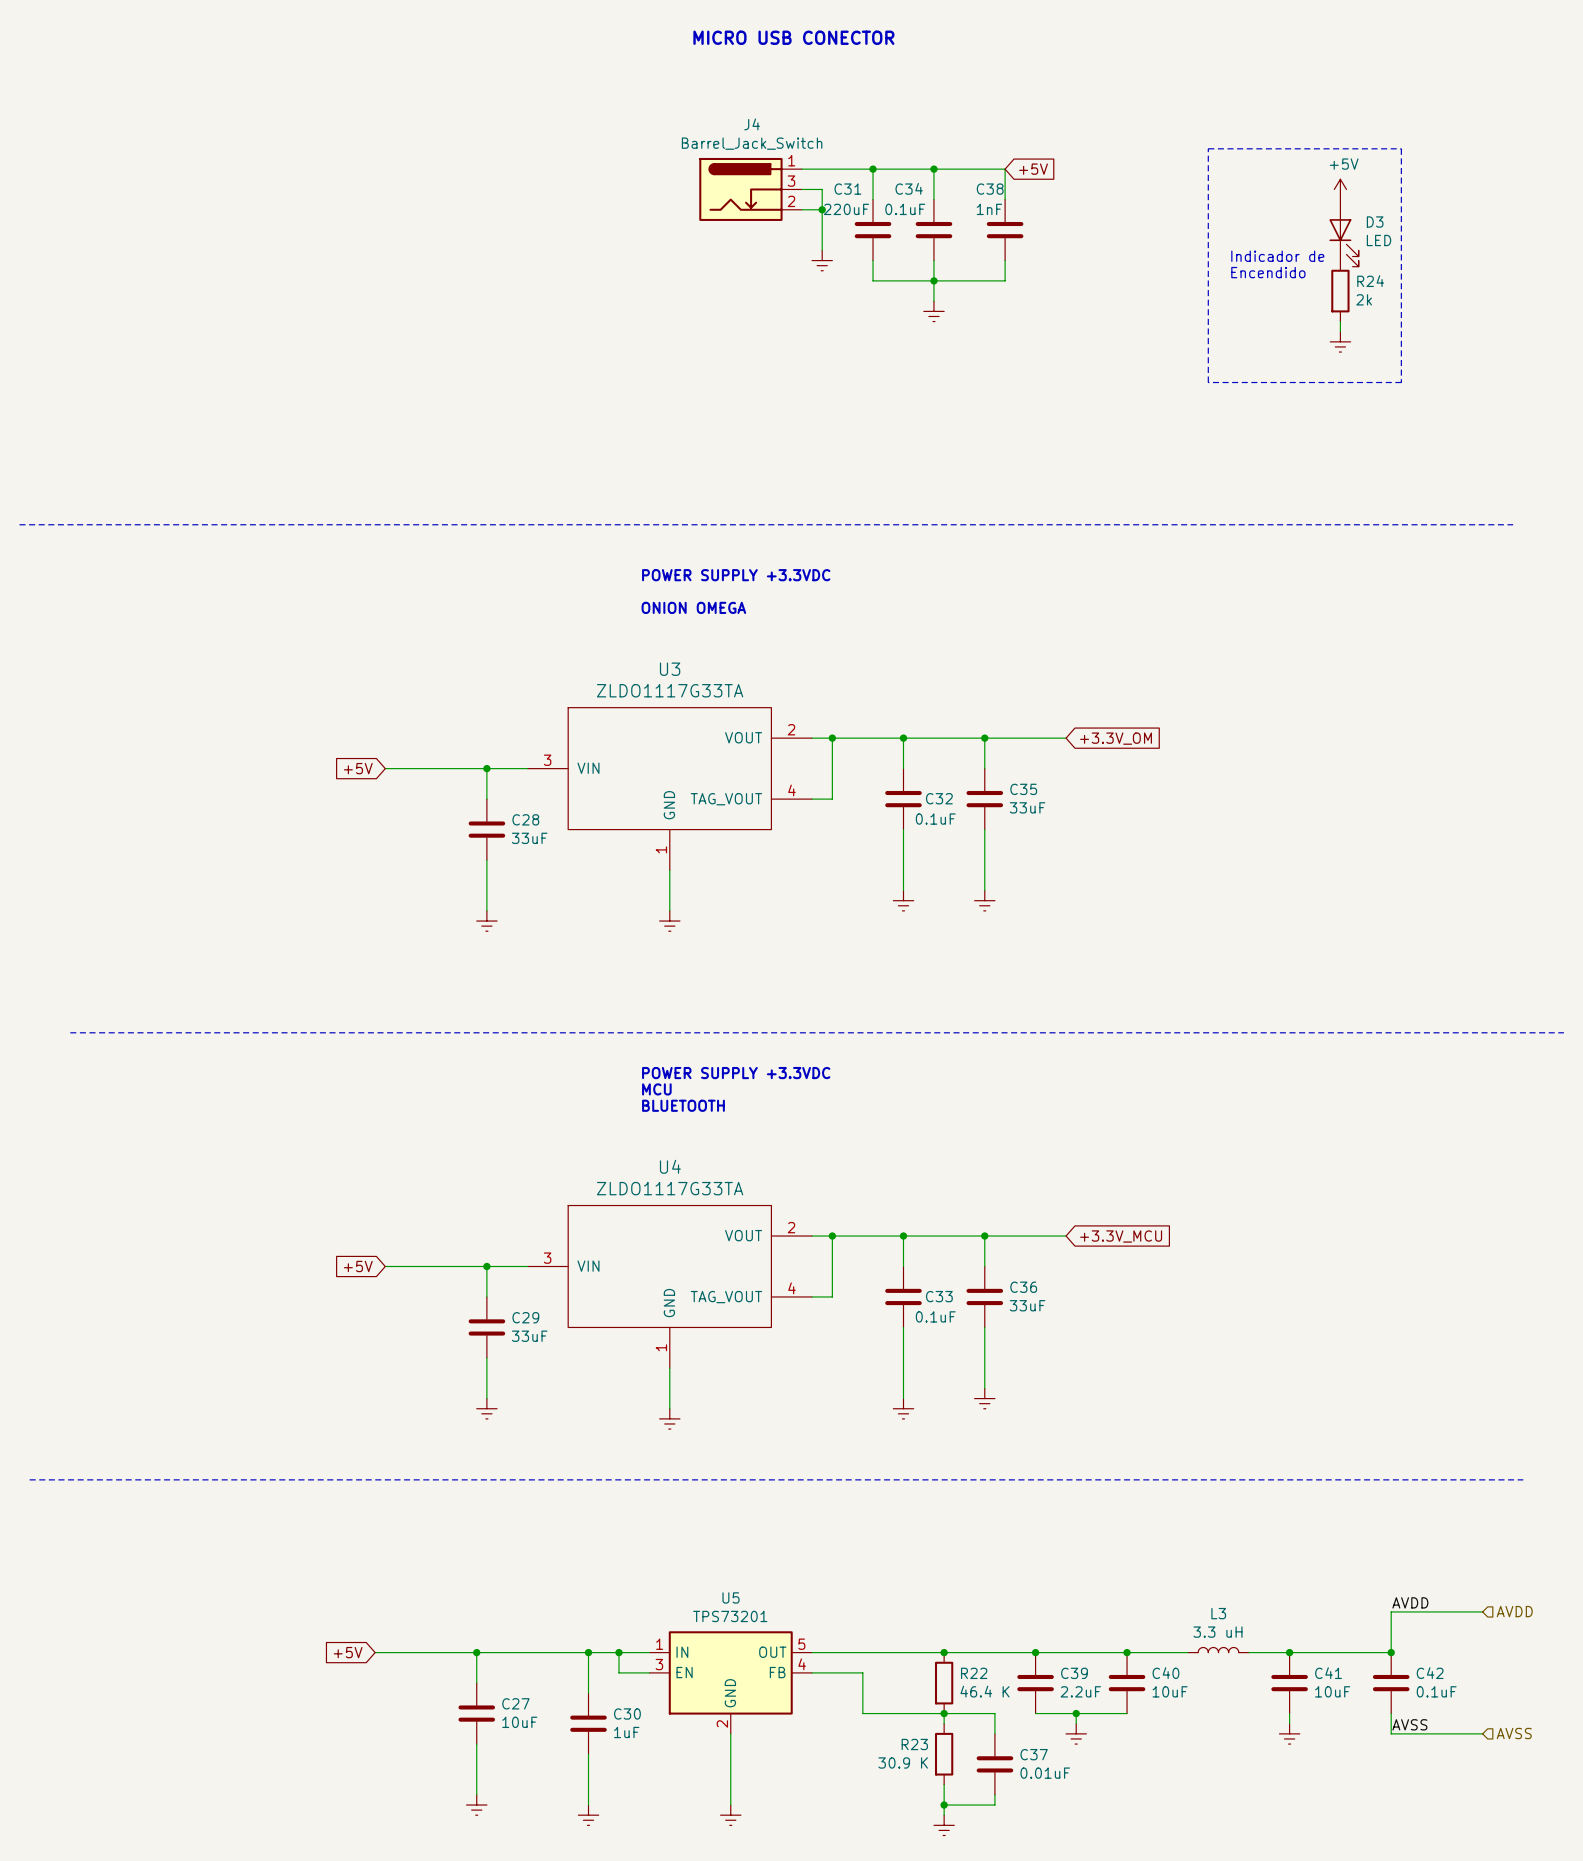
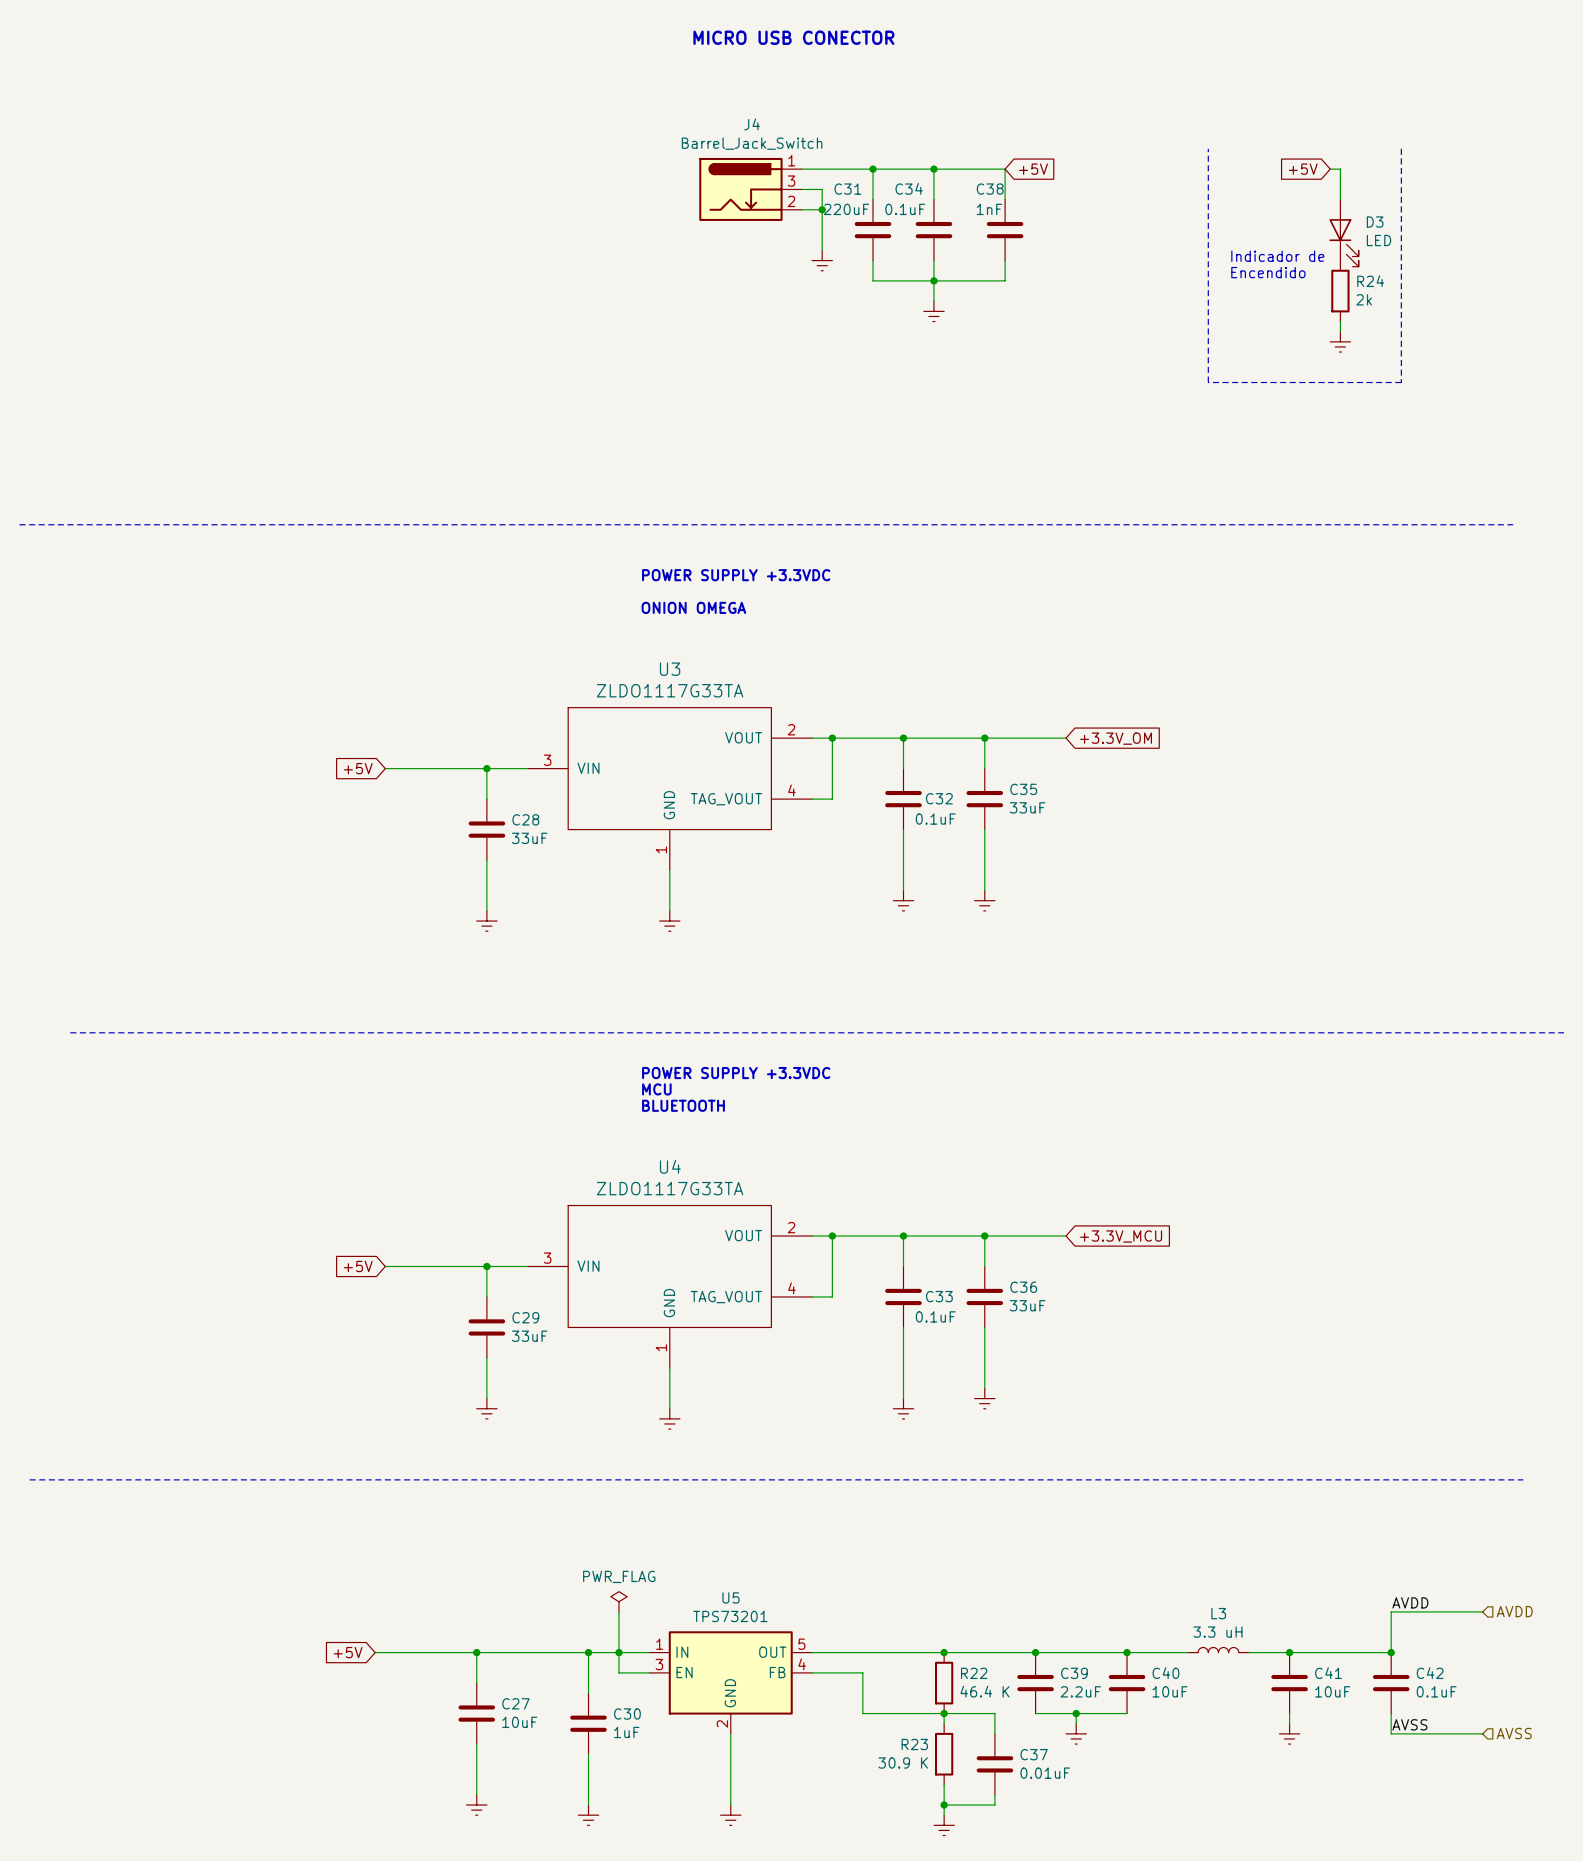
line: (1208, 148) (1401, 148) -> none
global label: none -> +5V (1303, 169)
wire: none -> (1330, 169) (1340, 169) (1340, 199)
power symbol: +5V (1340, 189) -> none
power symbol: none -> PWR_FLAG (618, 1601)
wire: none -> (618, 1611) (618, 1652)

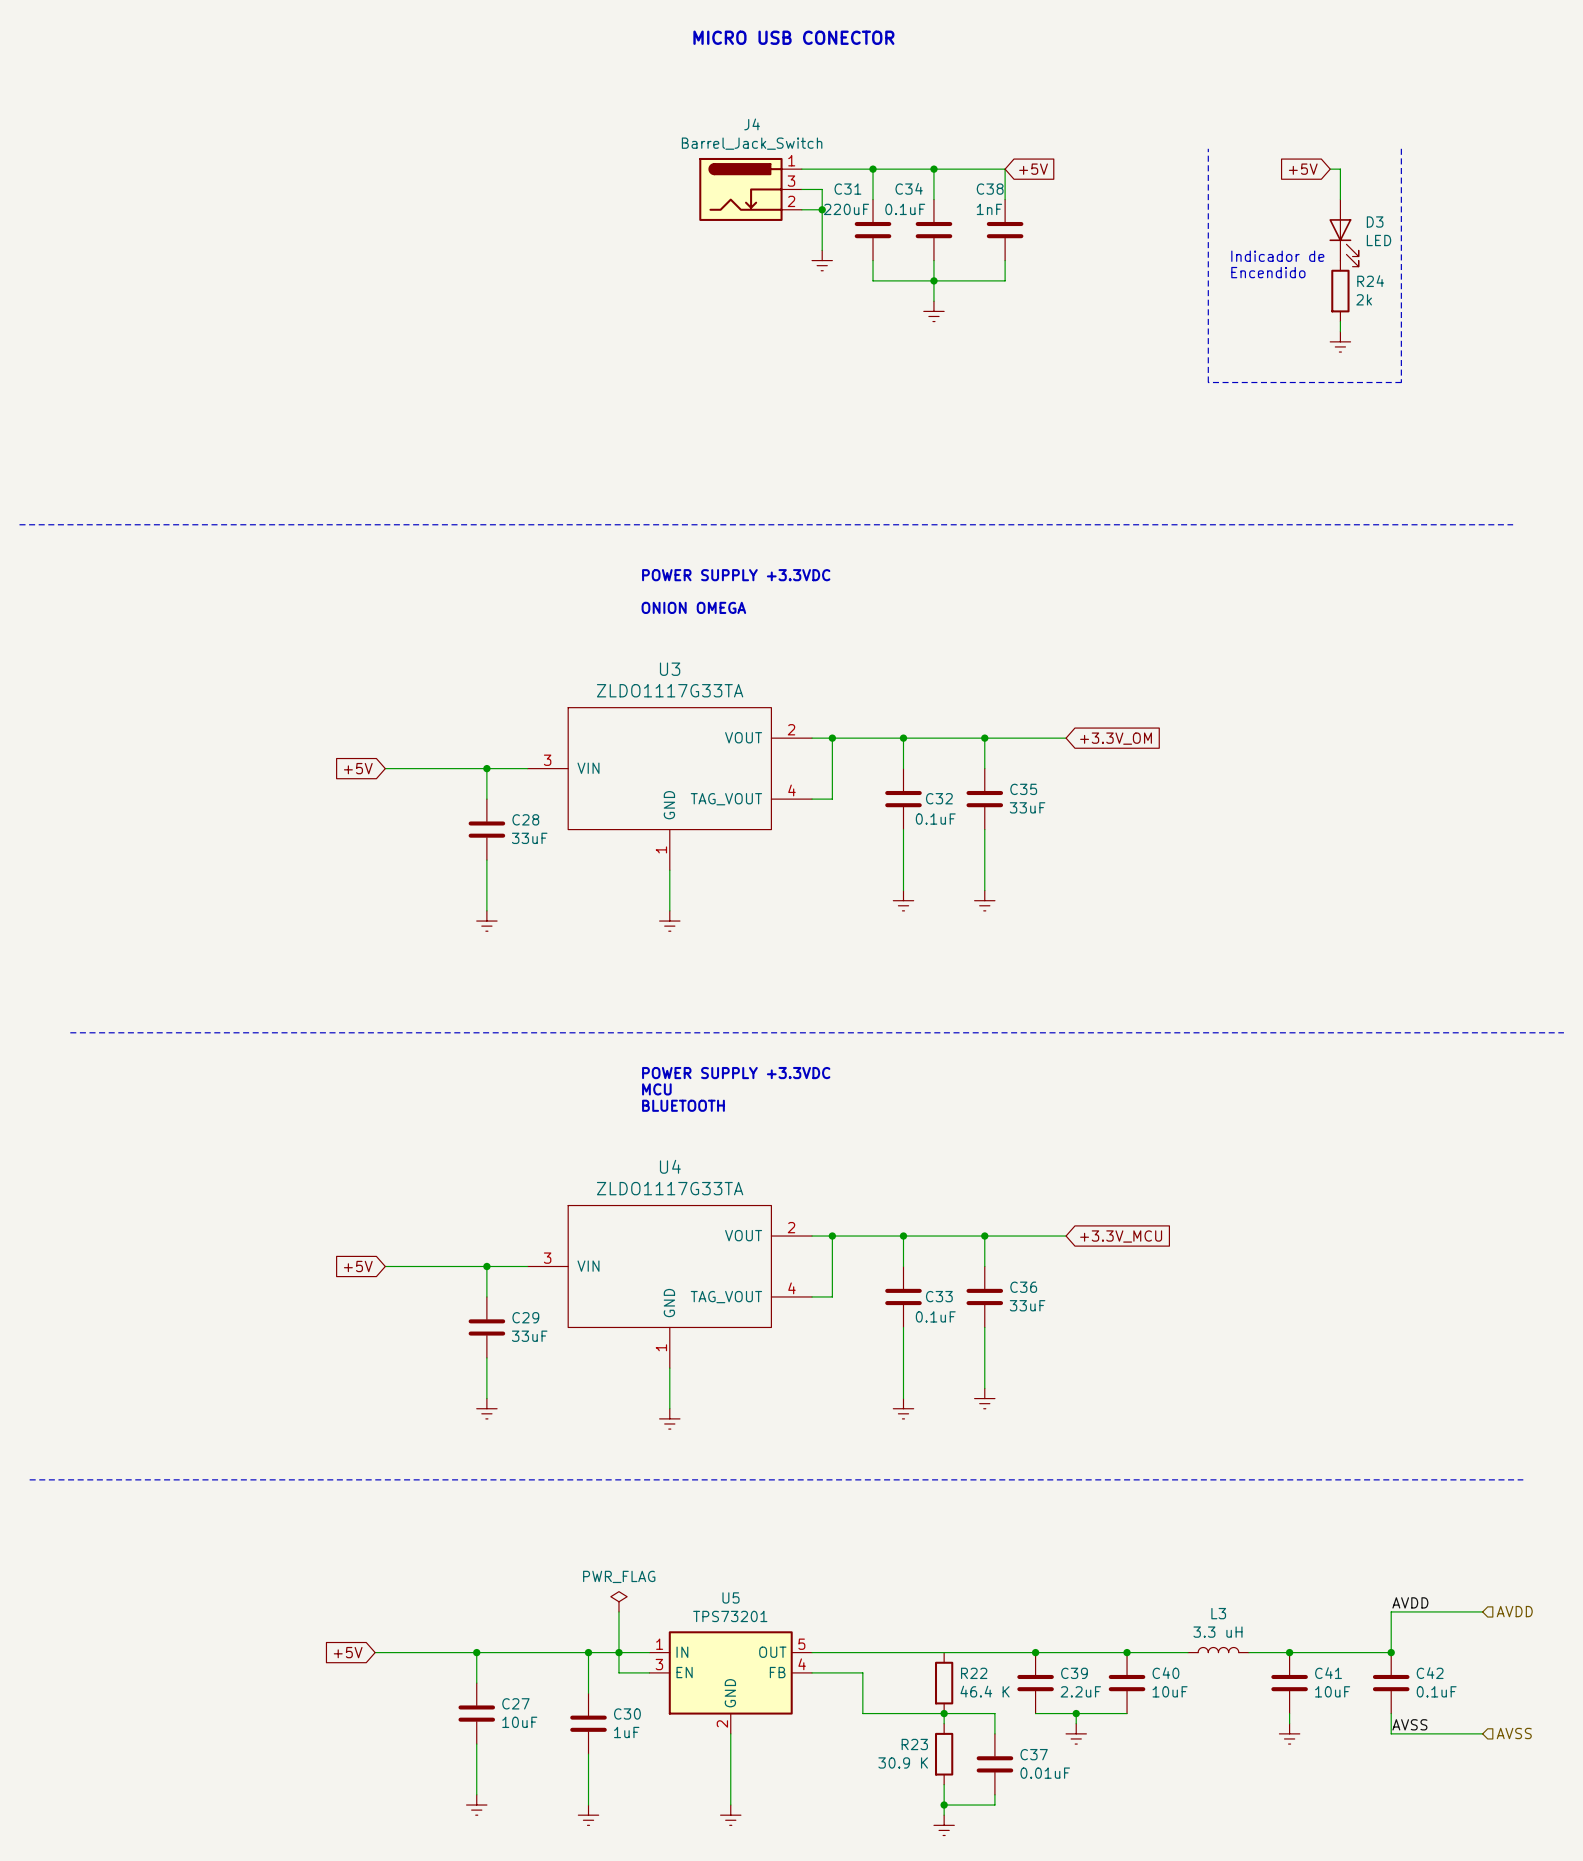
junction: (944, 1652) -> none

